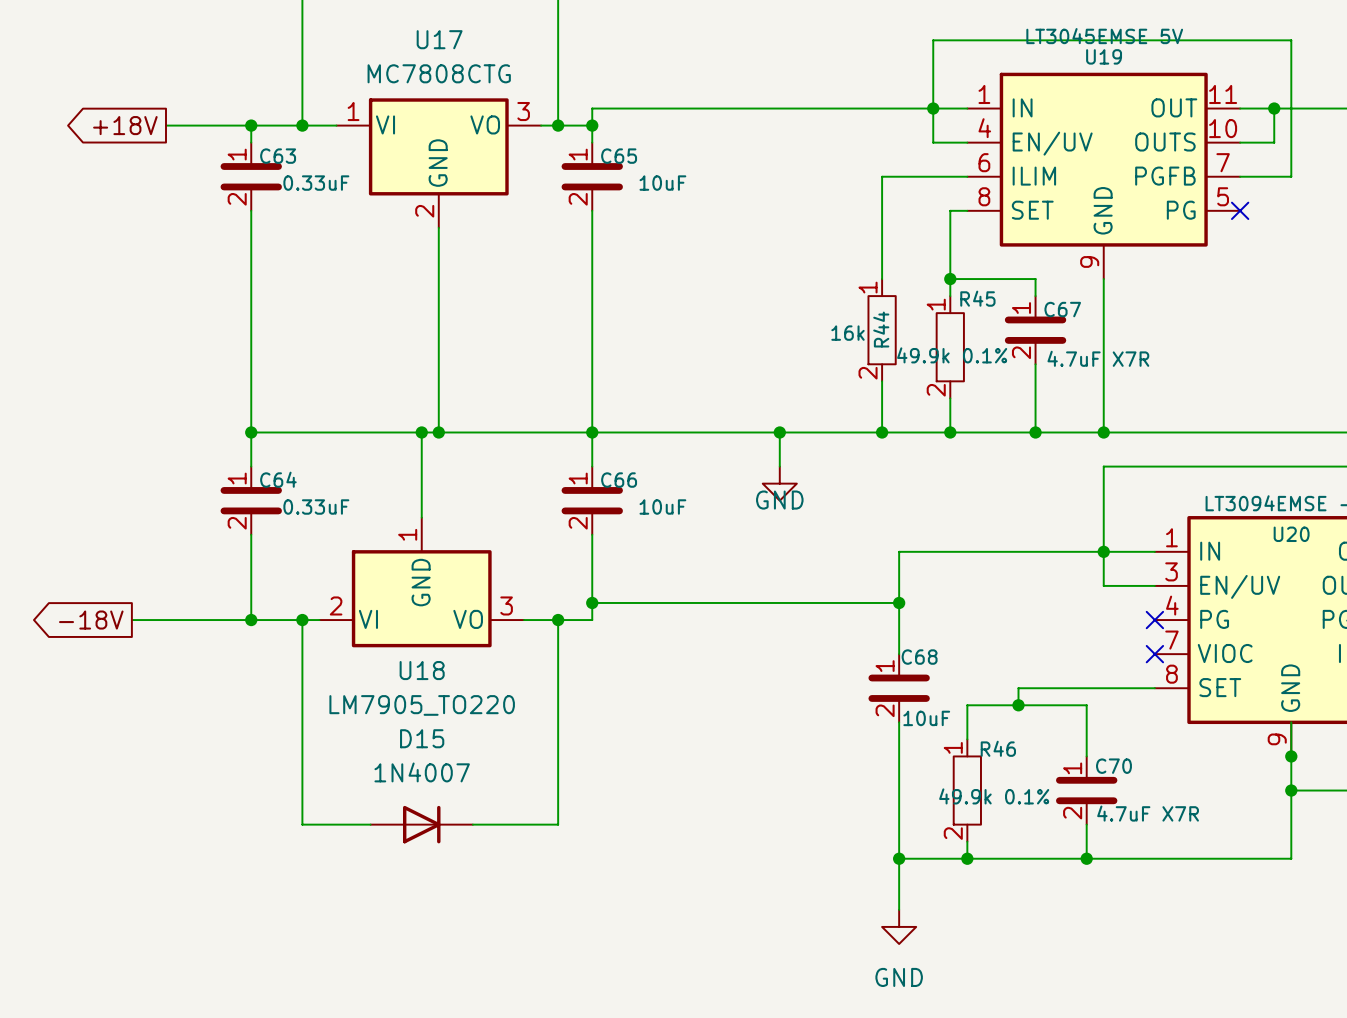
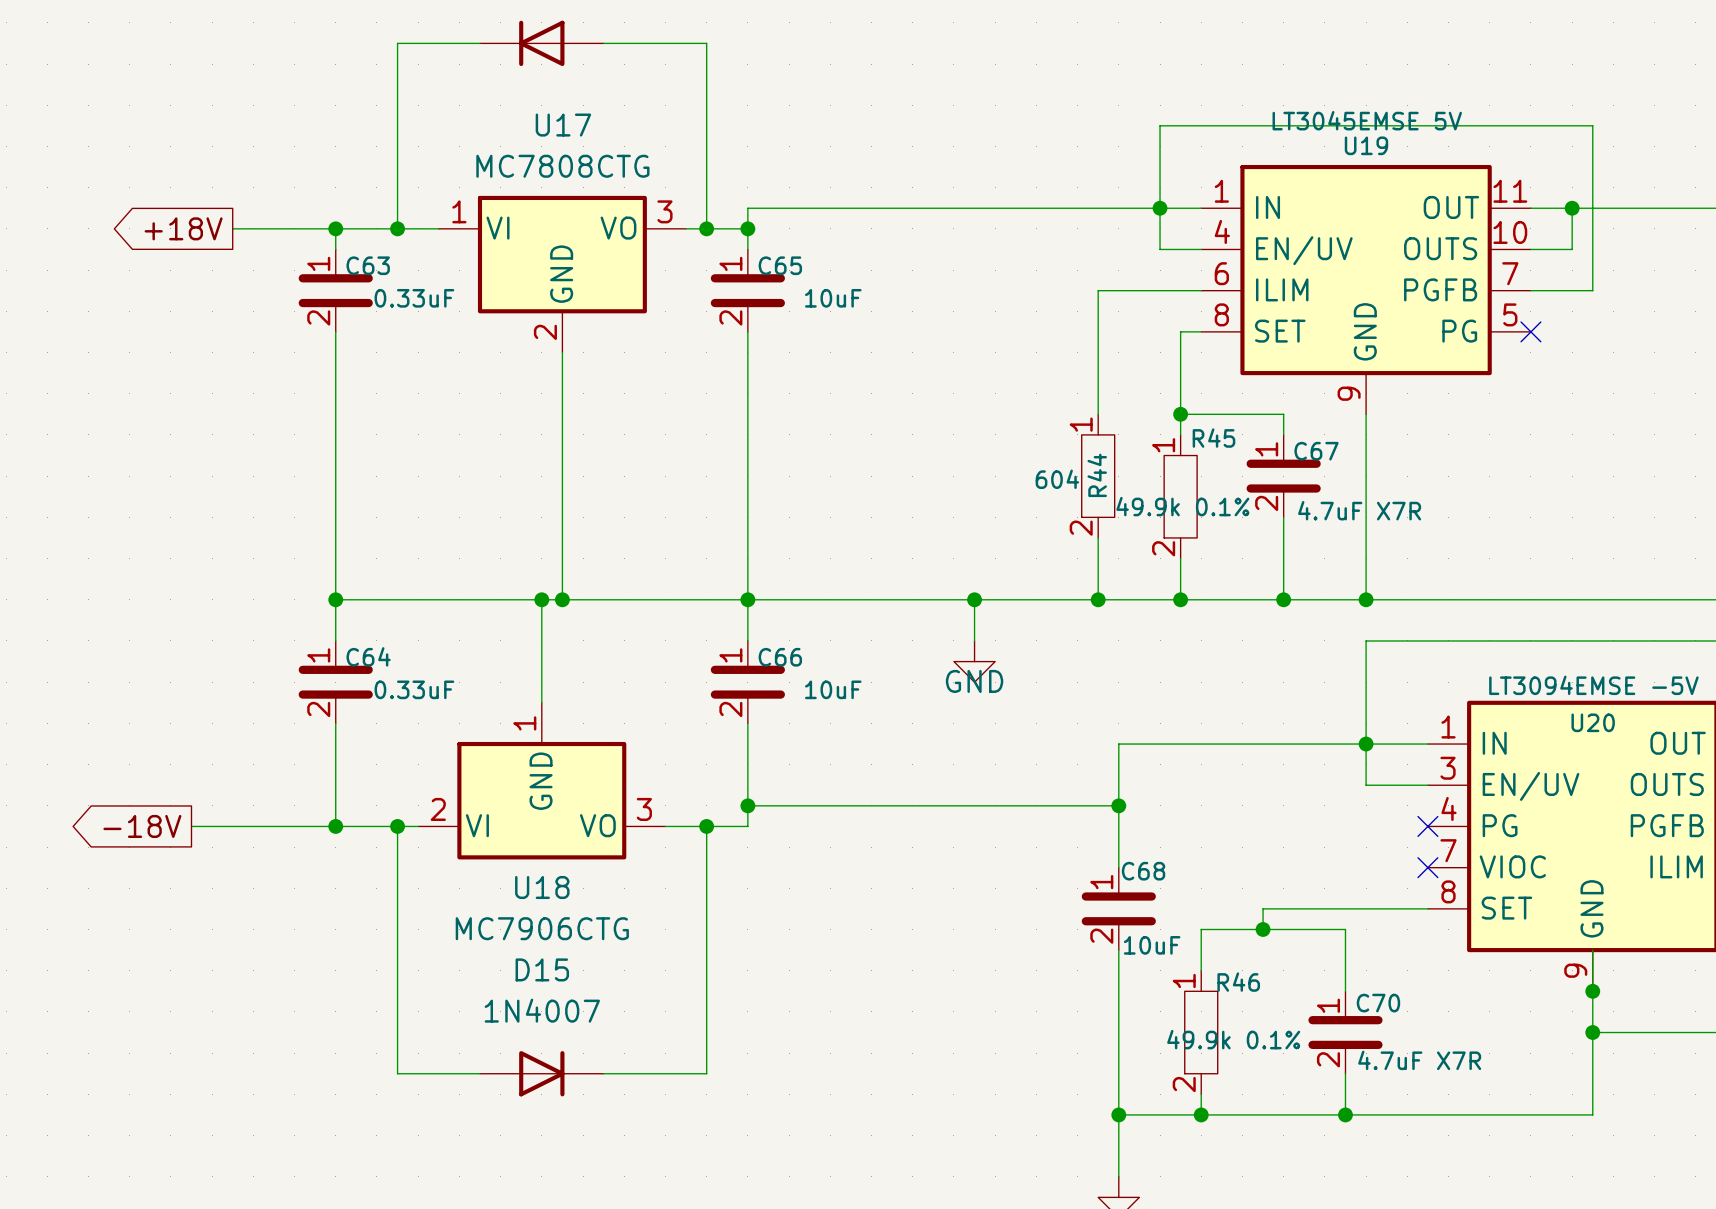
R44 value: 16k (848, 333) -> 604 (1057, 479)
U18 value: LM7905_TO220 (422, 705) -> MC7906CTG (542, 928)

